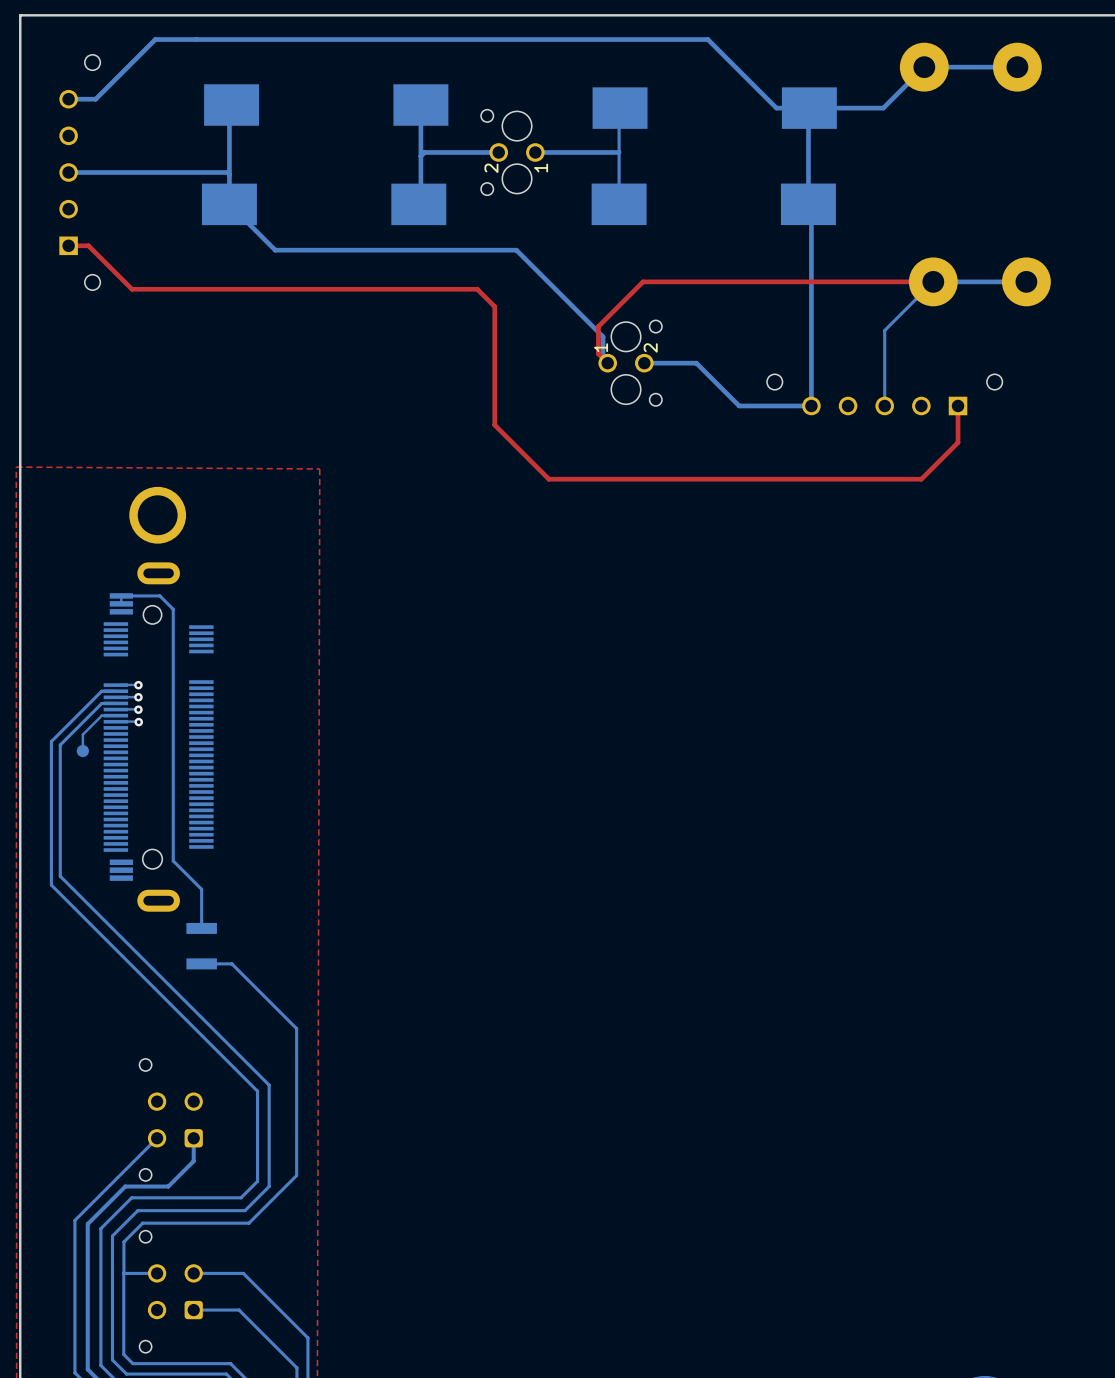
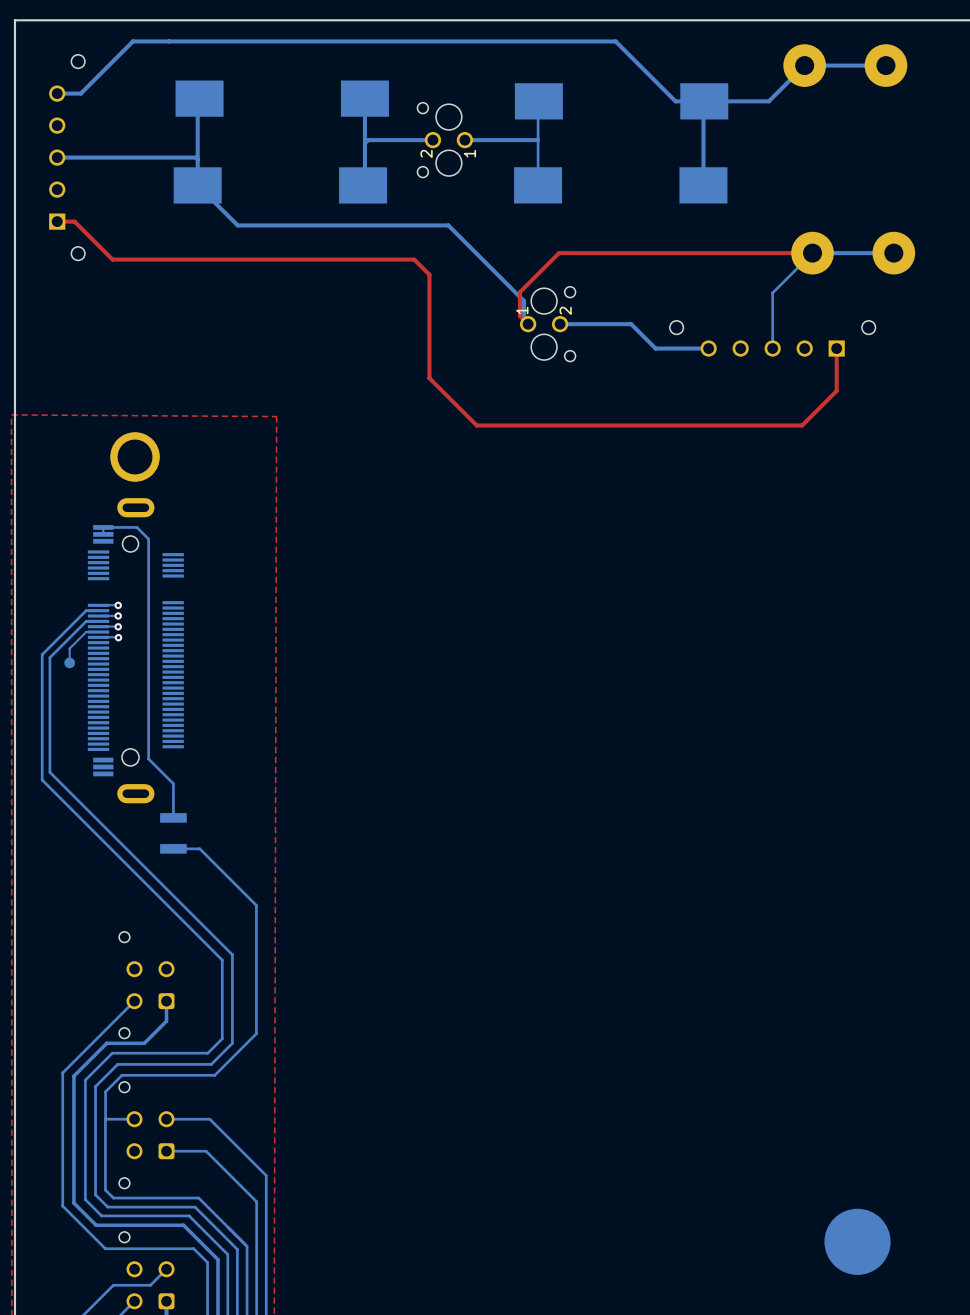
bottom track: (808, 204) (811, 207) (811, 405) (739, 405) (696, 363) -> (708, 348) (655, 348) (631, 324) (605, 324)
bottom track: (887, 327) (884, 330) (884, 405) -> (772, 292) (772, 348)
part position: (884, 394) -> (772, 338)
top track: (958, 405) (958, 442) -> (836, 348) (836, 390) (834, 393)

